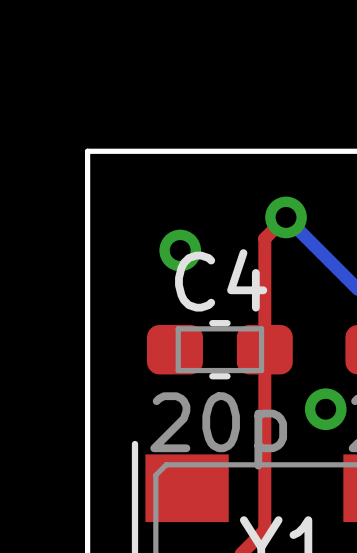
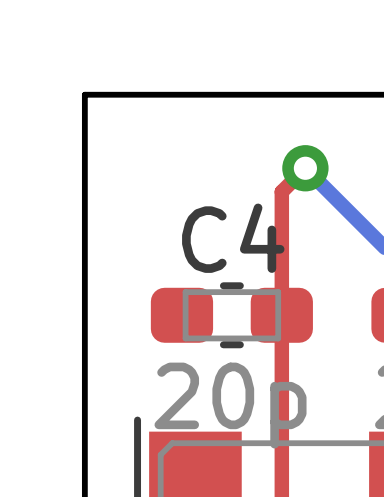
via: (180, 250) -> none
via: (325, 409) -> none

